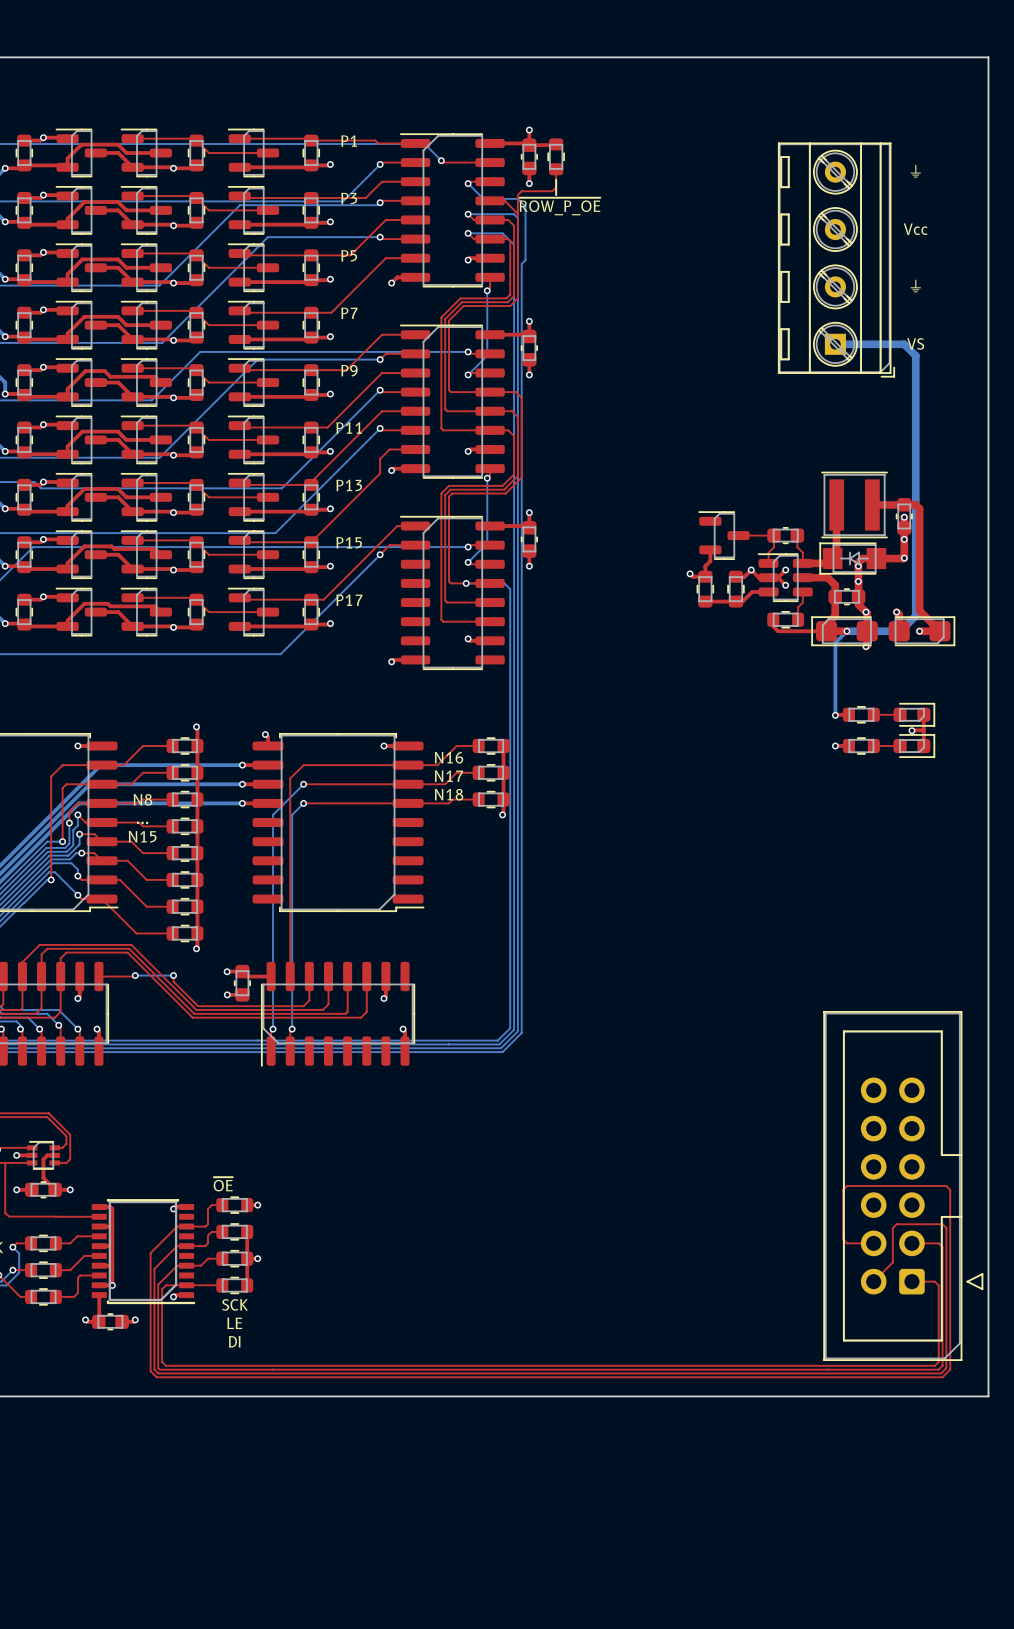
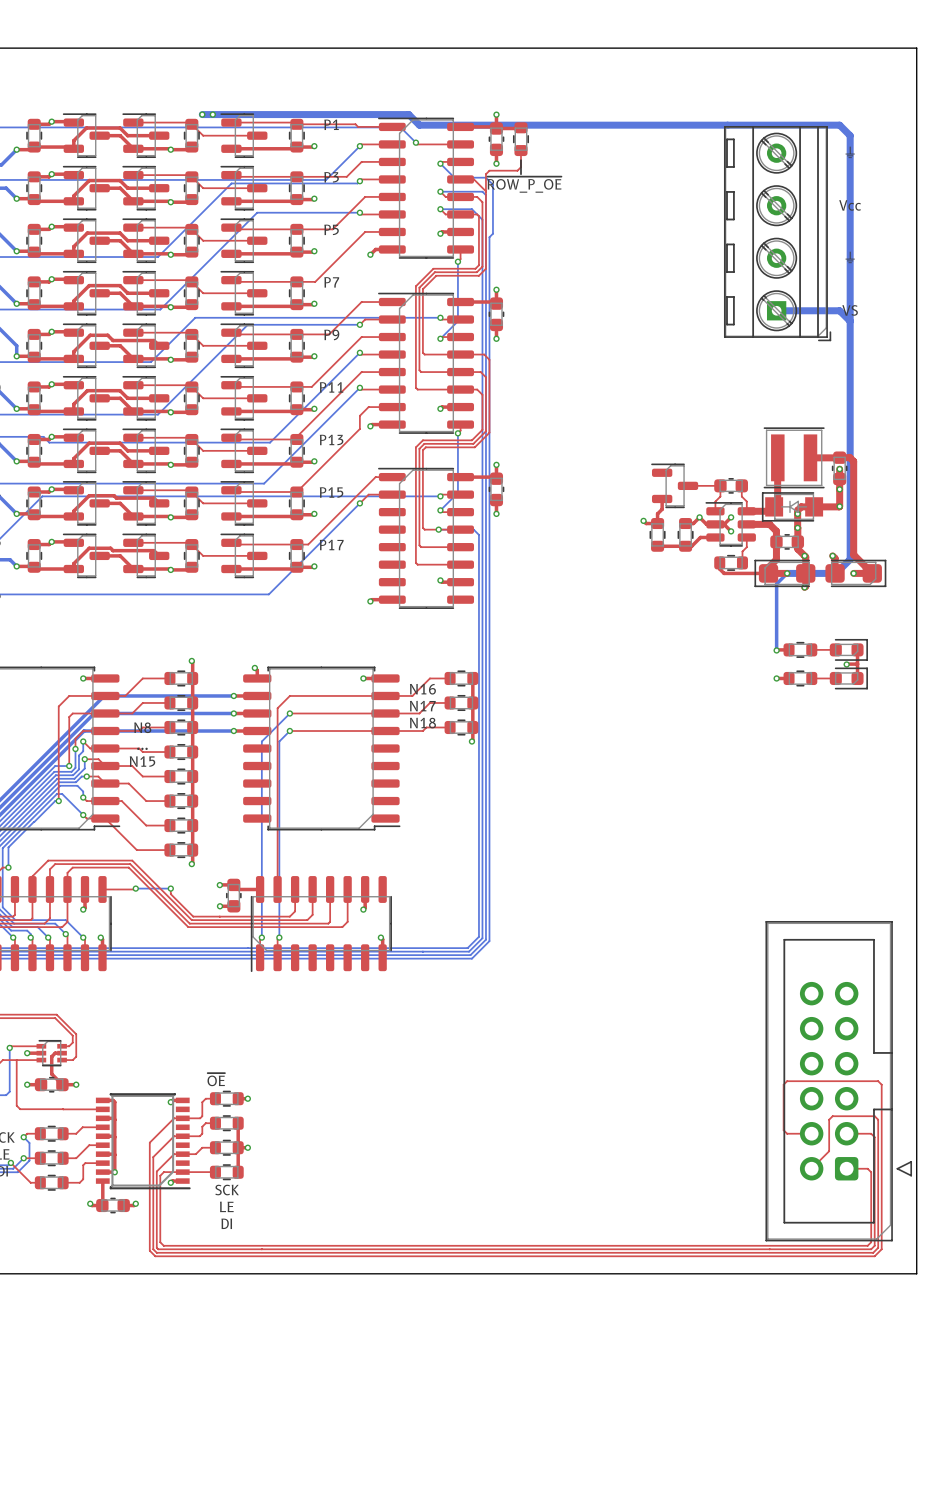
bottom track: none -> (202, 114) (408, 114) (419, 125) (839, 125) (850, 135) (850, 321)
via: none -> (202, 114)
via: none -> (212, 114)

